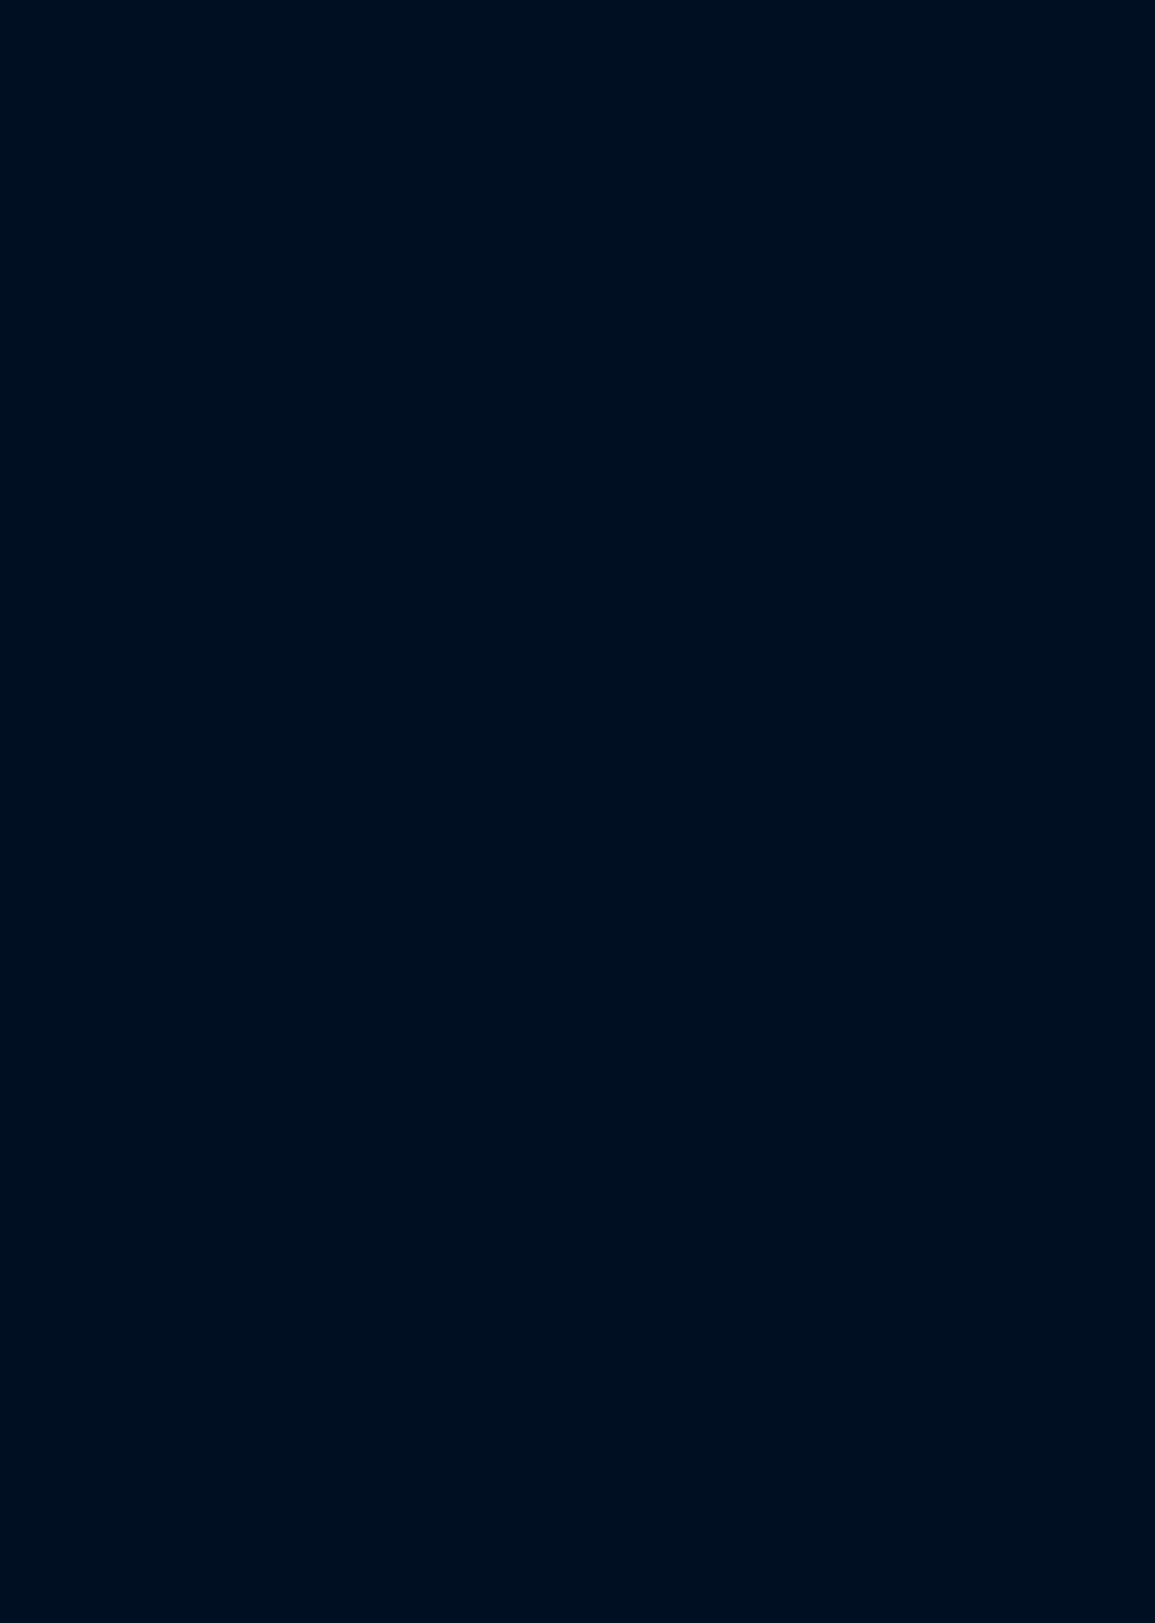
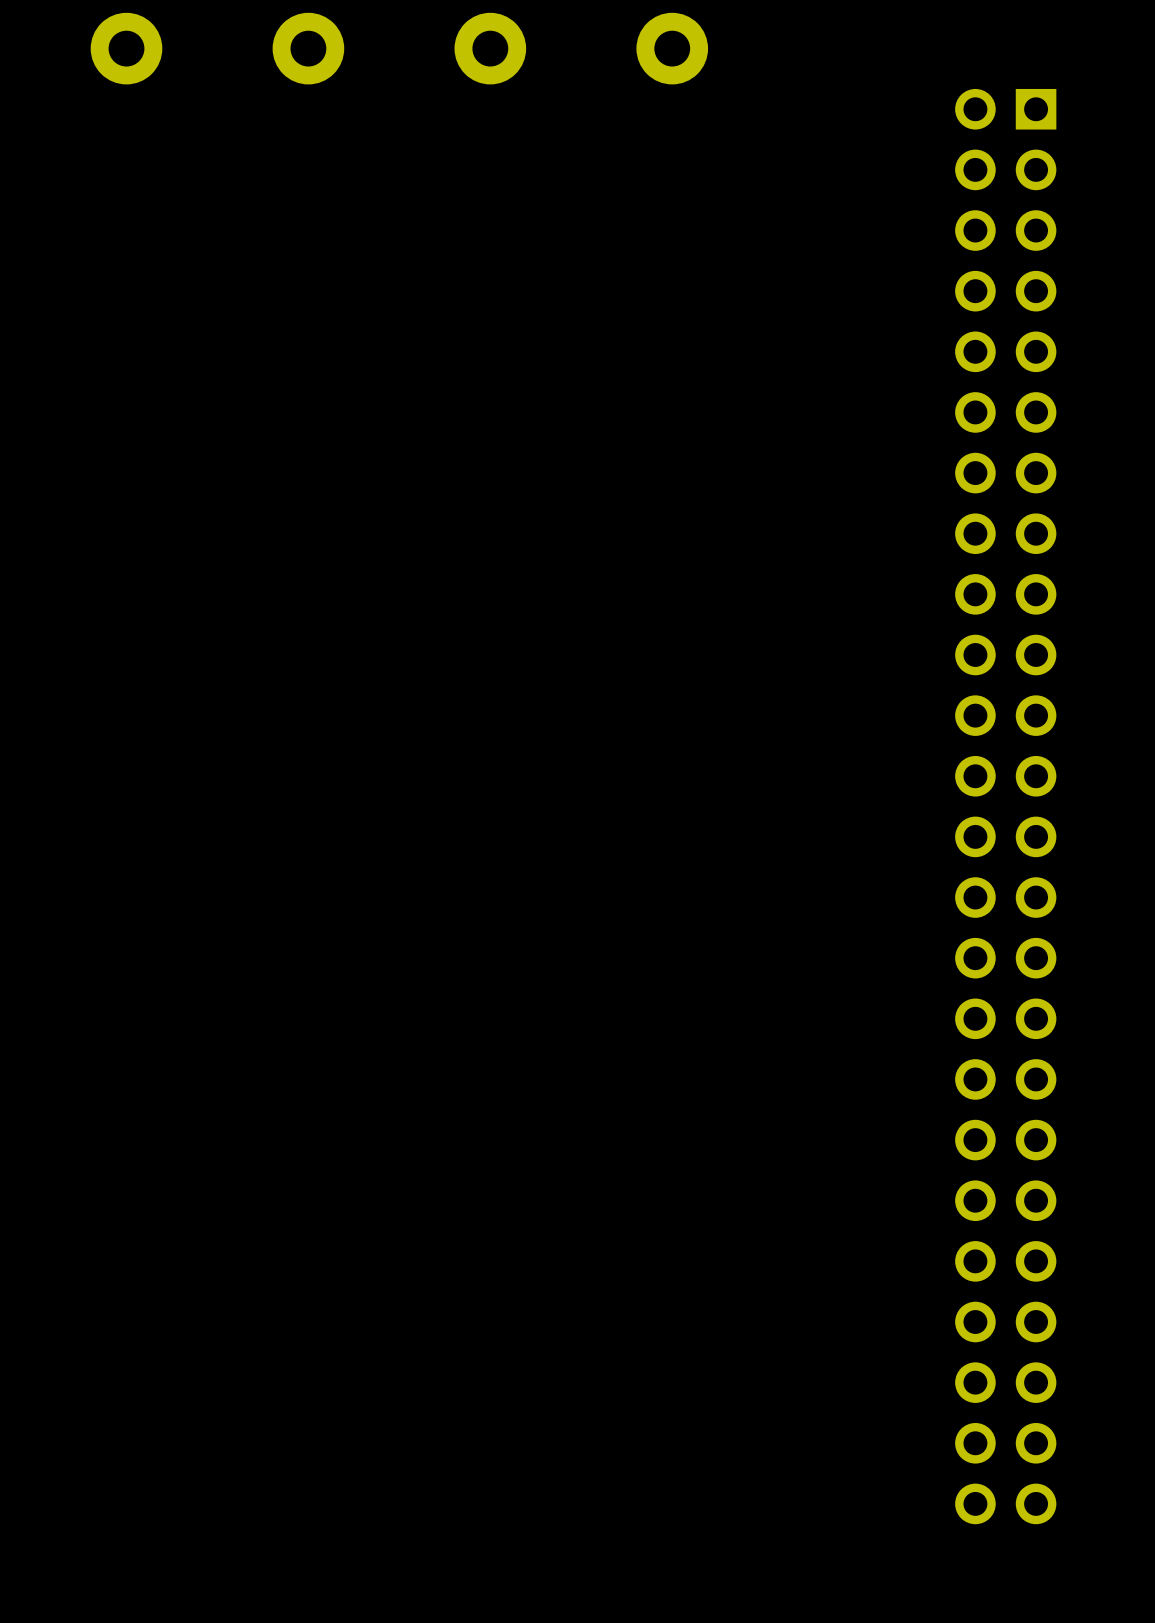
part: none -> (126, 48)
part: none -> (308, 48)
part: none -> (490, 48)
part: none -> (672, 48)
part: none -> (1005, 806)

